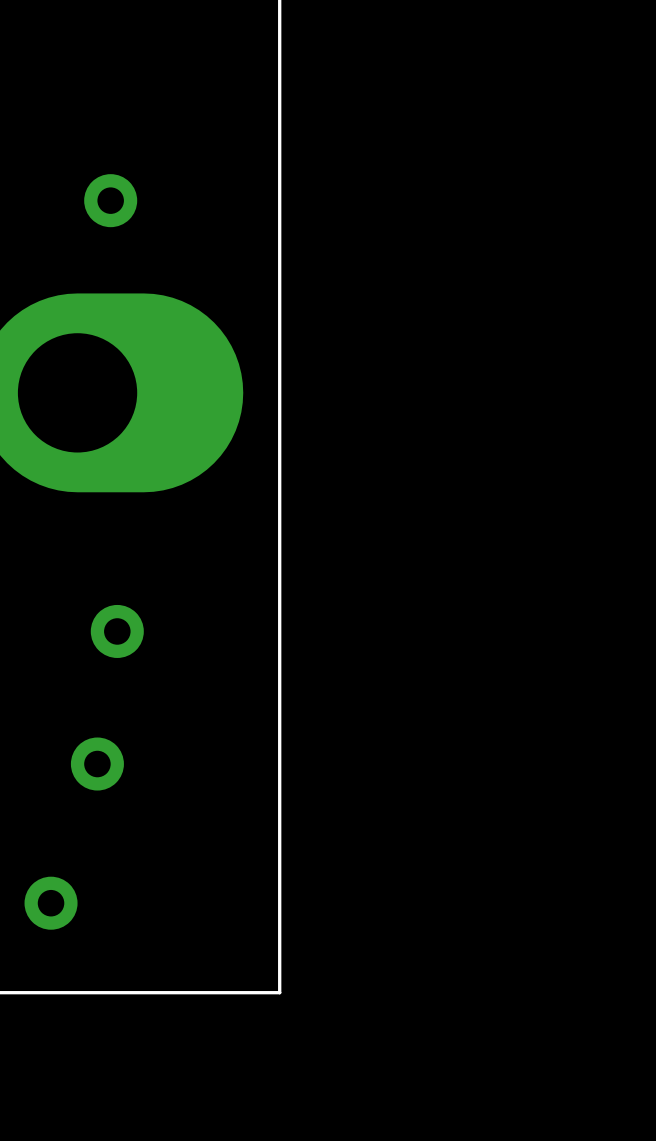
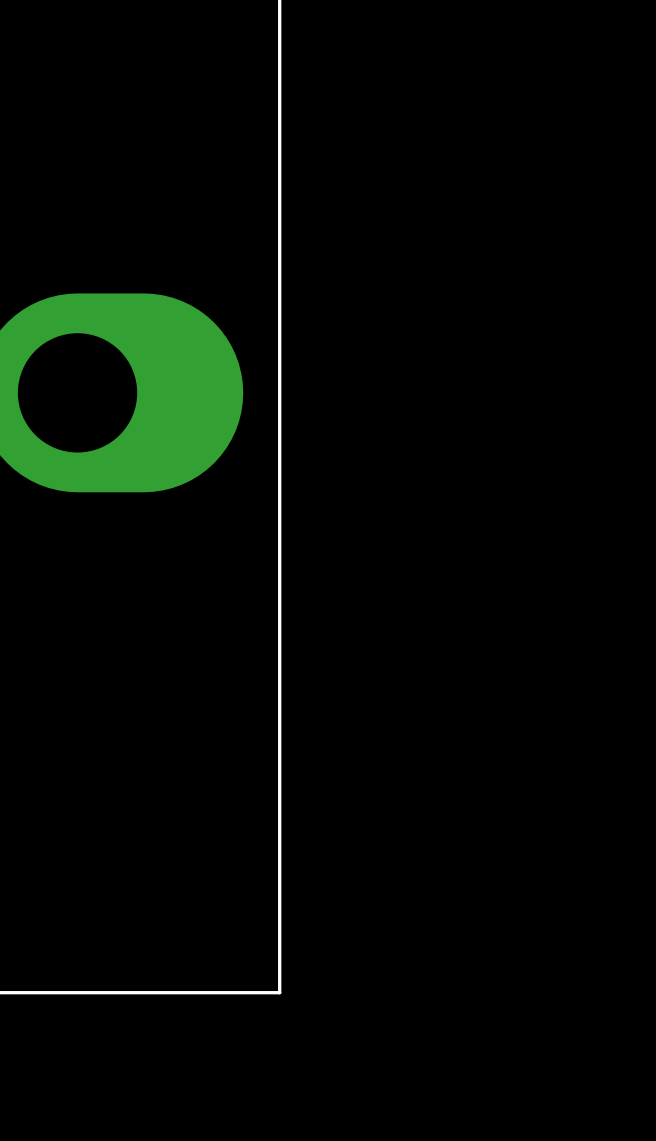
via: (110, 200) -> none
via: (117, 631) -> none
via: (97, 764) -> none
via: (51, 903) -> none

